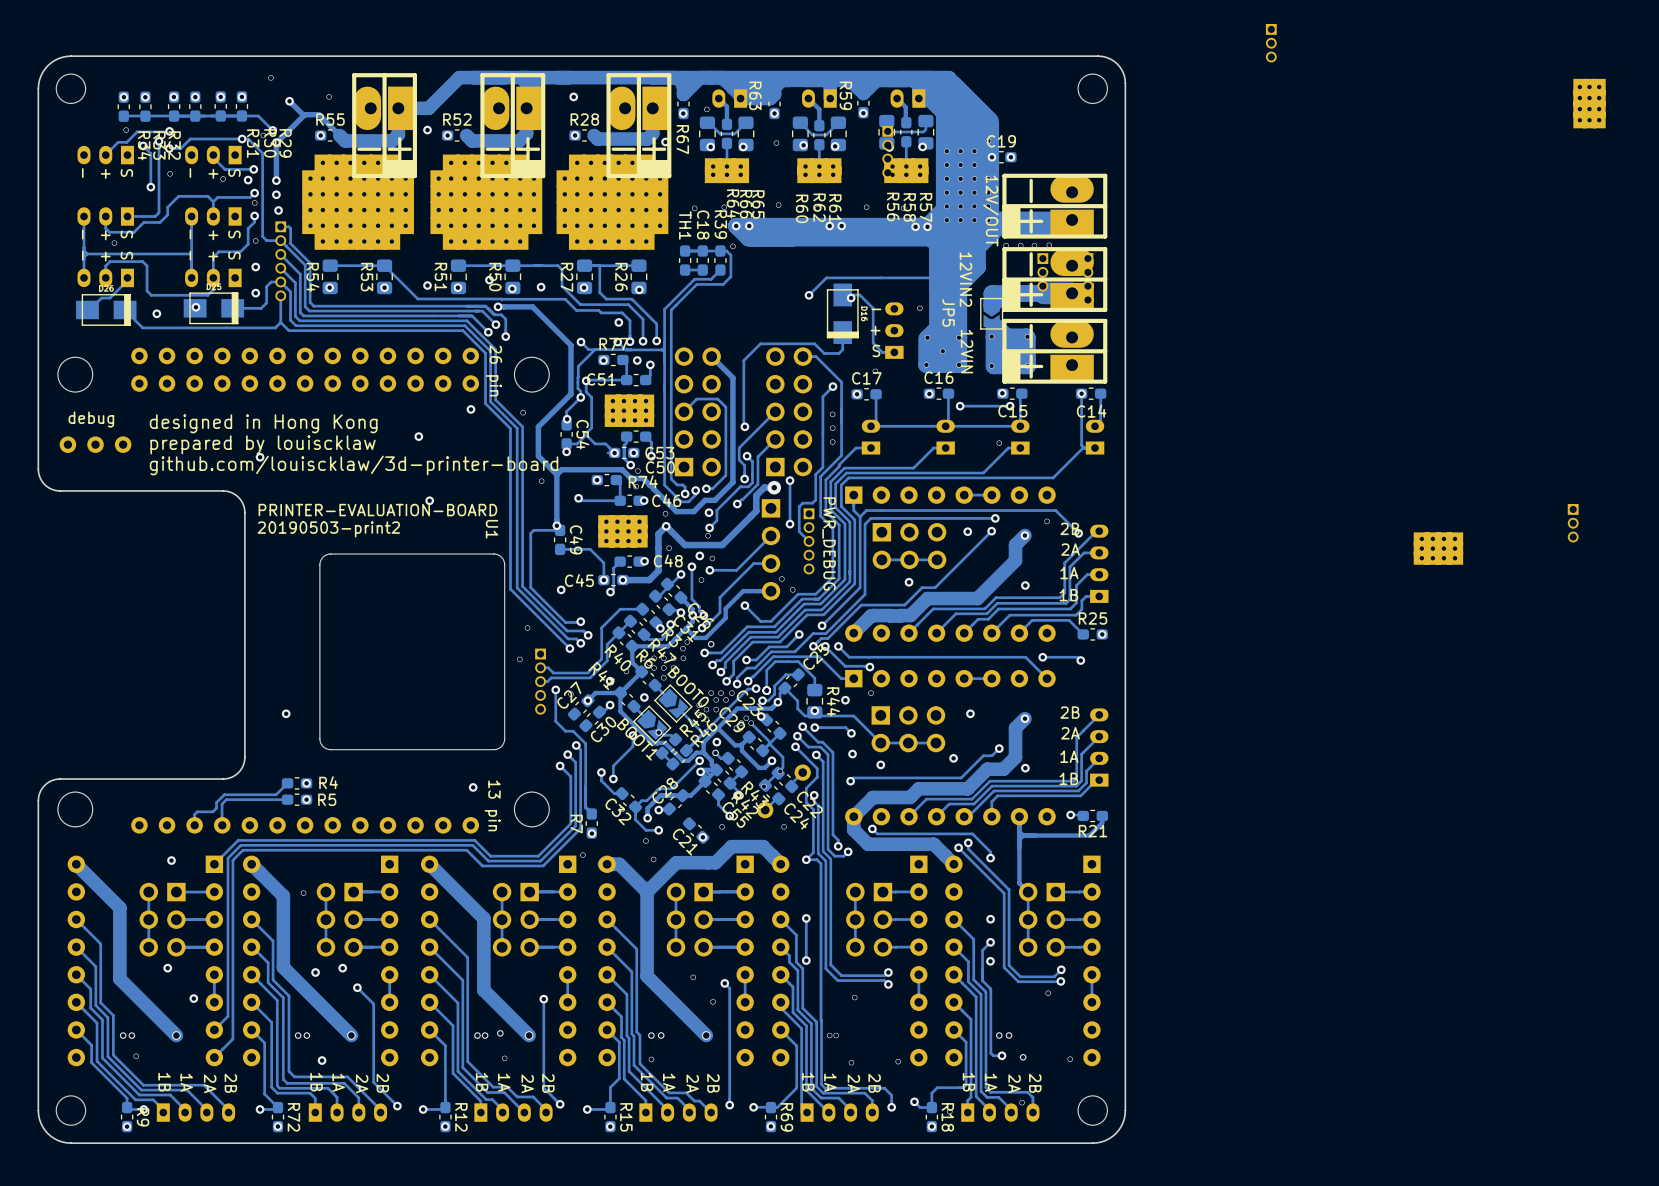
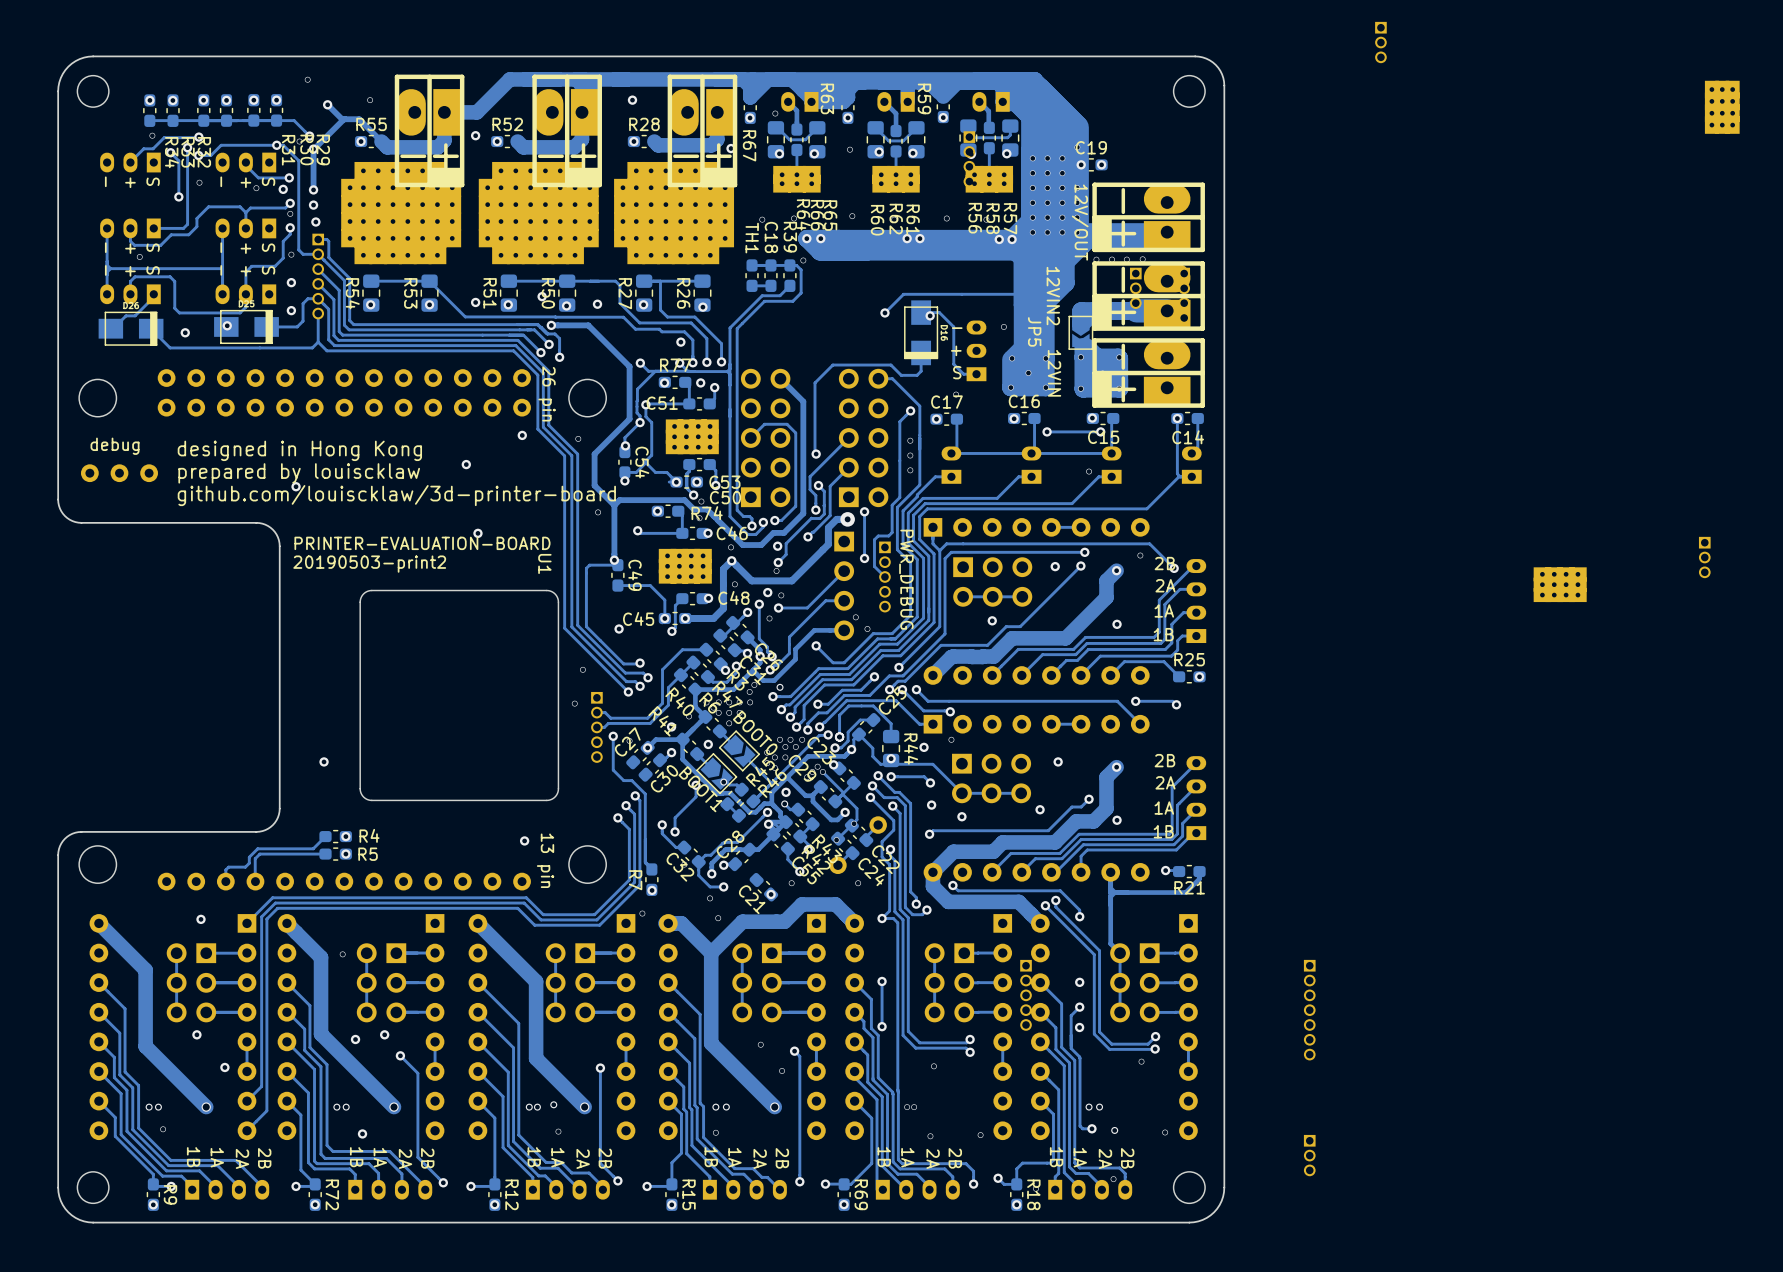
part: none -> (1026, 995)
part: none -> (1309, 1010)
part: none -> (1309, 1155)

